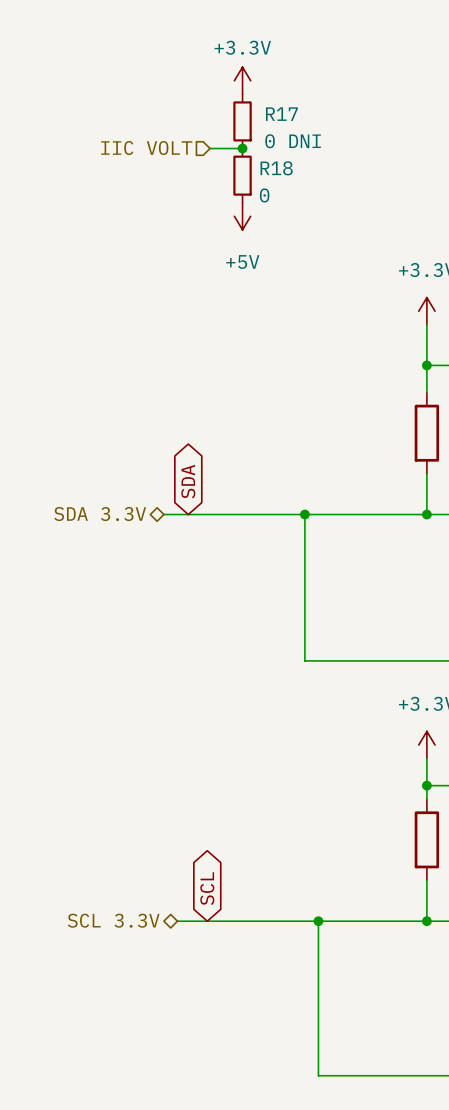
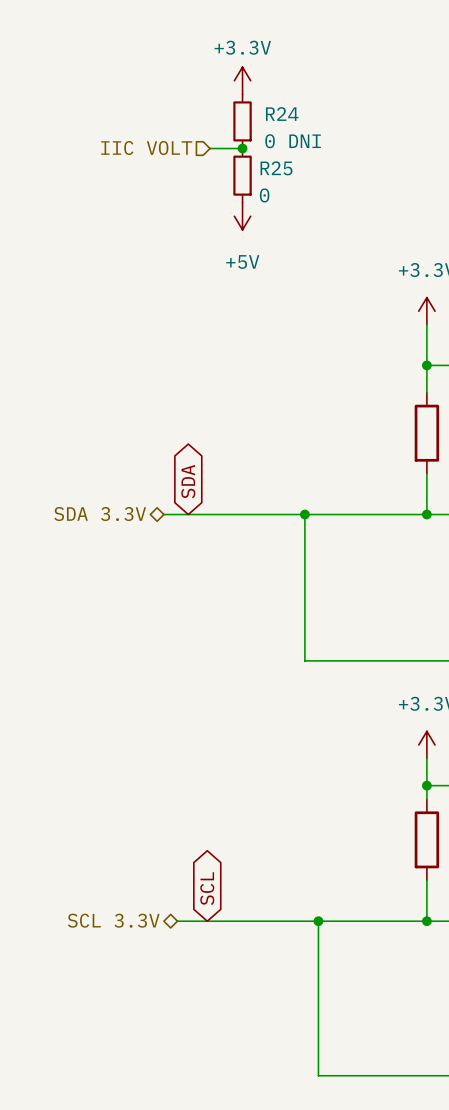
R17 name: R17 (281, 114) -> R24 (282, 114)
R18 name: R18 (276, 168) -> R25 (276, 168)

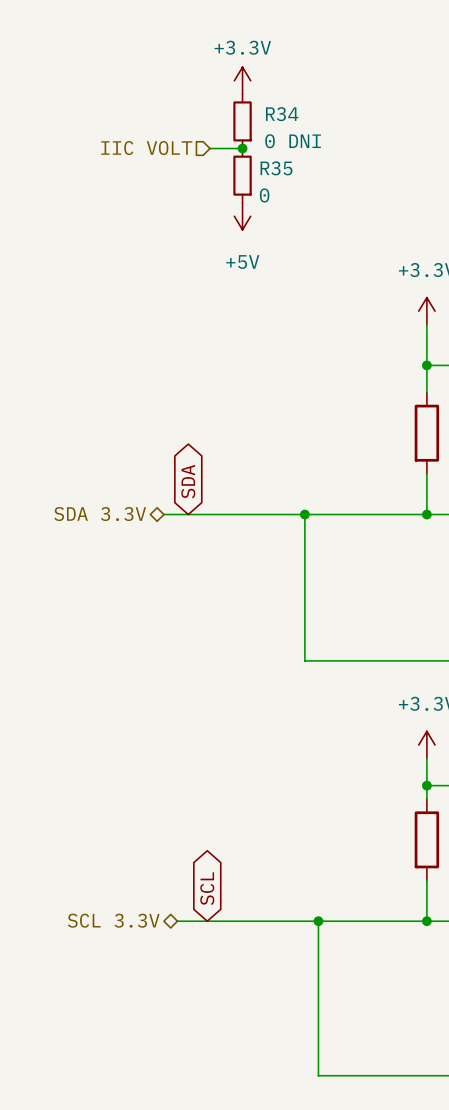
R24 name: R24 (282, 114) -> R34 (282, 114)
R25 name: R25 (276, 168) -> R35 (276, 168)

